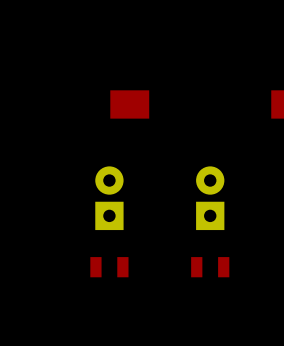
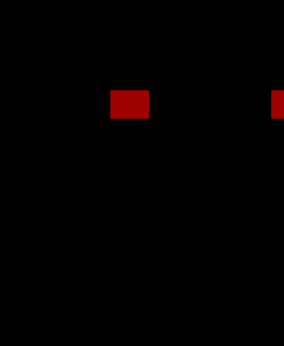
part: (109, 198) -> none
part: (210, 198) -> none
part: (109, 267) -> none
part: (210, 267) -> none

